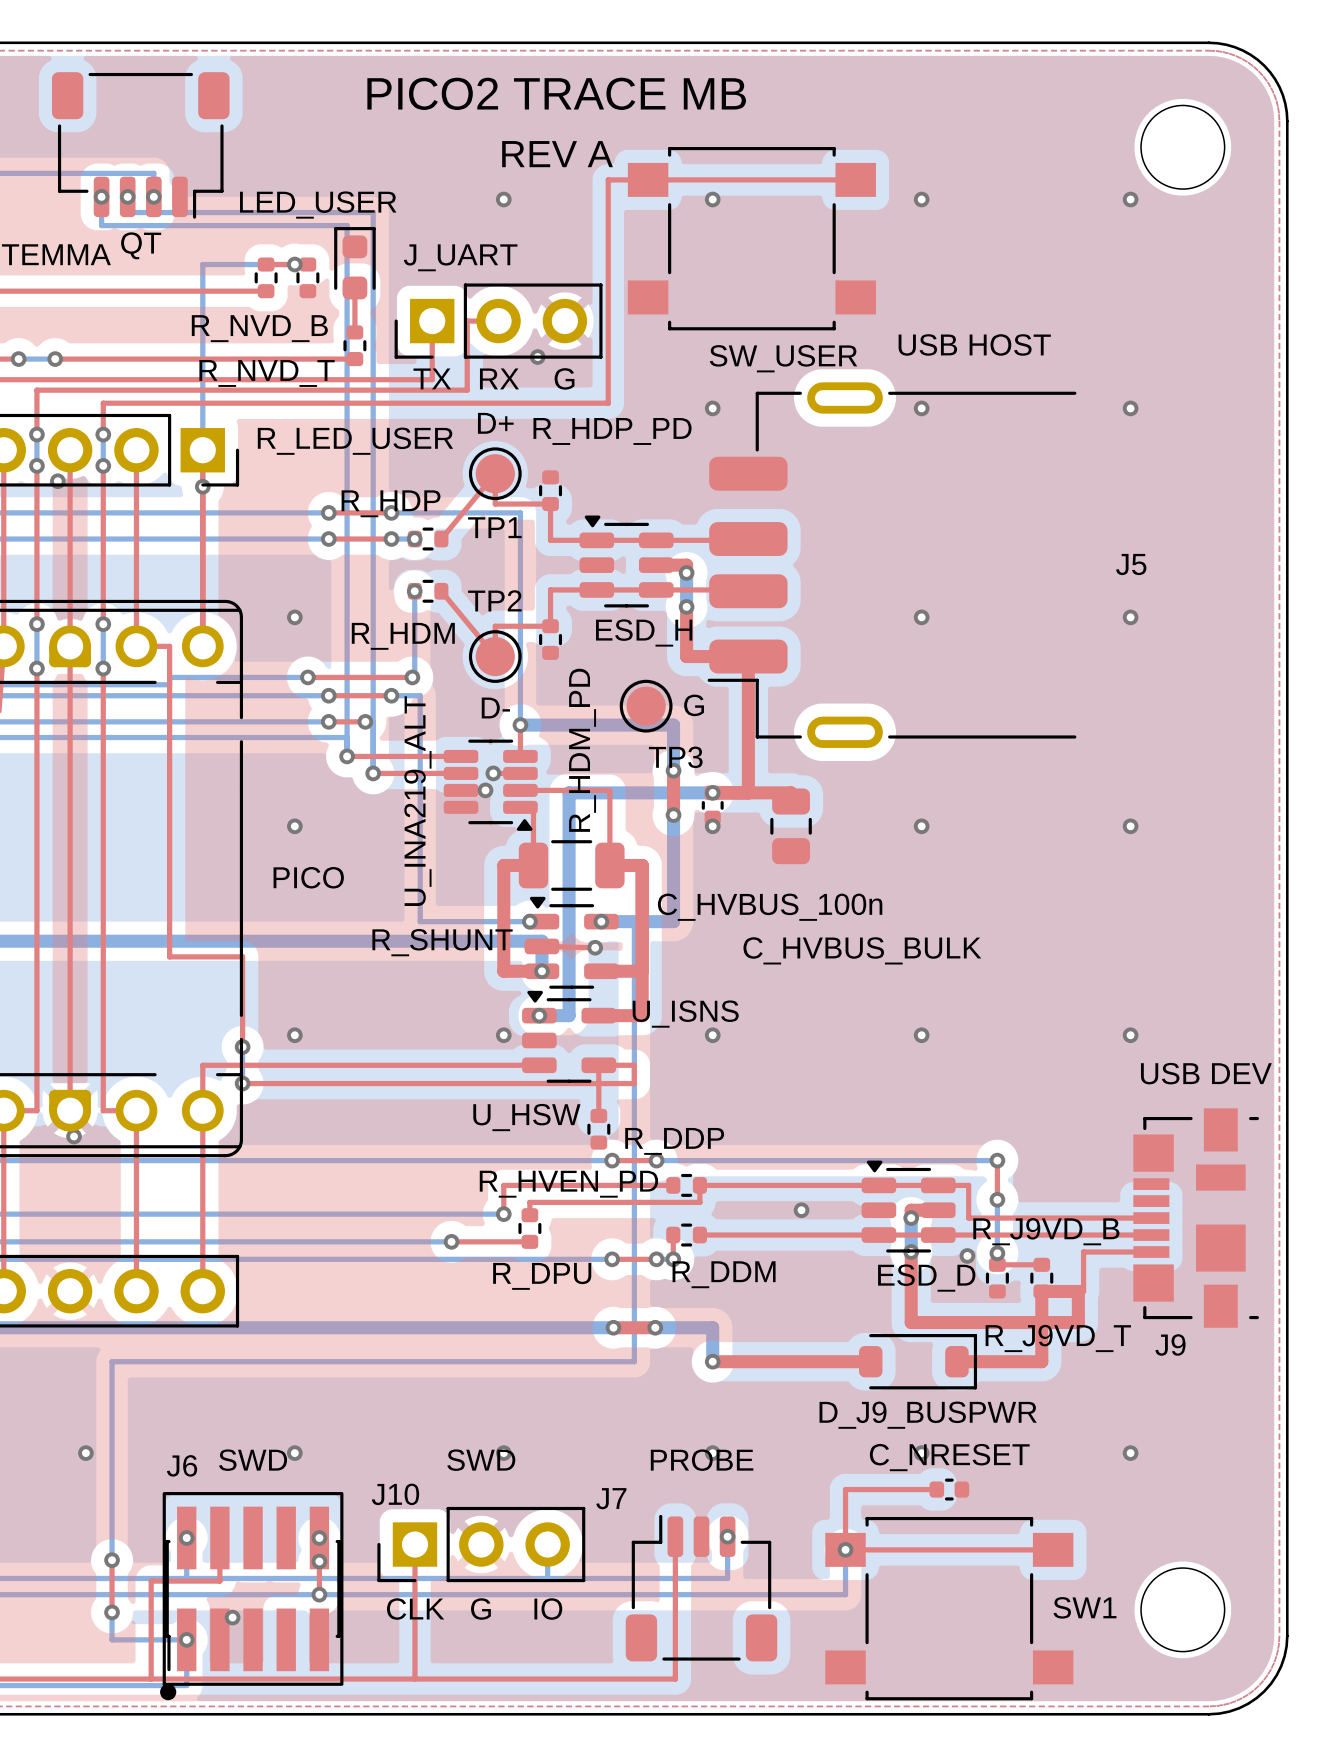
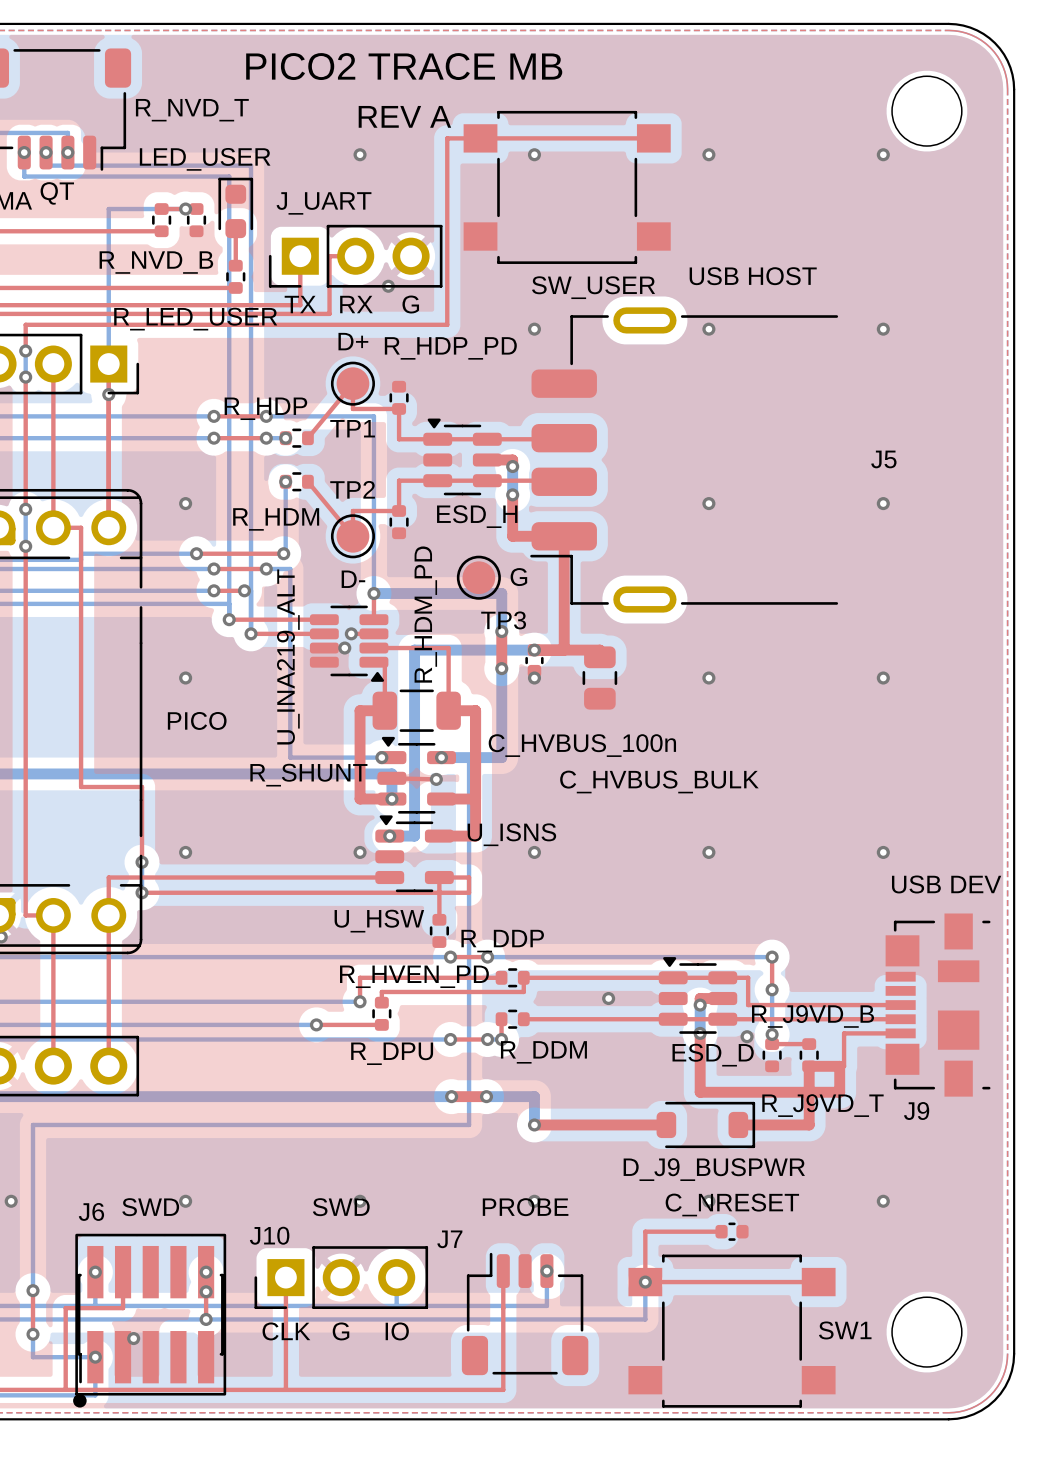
R_NVD_T name position: R_NVD_T (267, 373) -> R_NVD_T (192, 110)
R_LED_USER name position: R_LED_USER (355, 441) -> R_LED_USER (195, 319)

